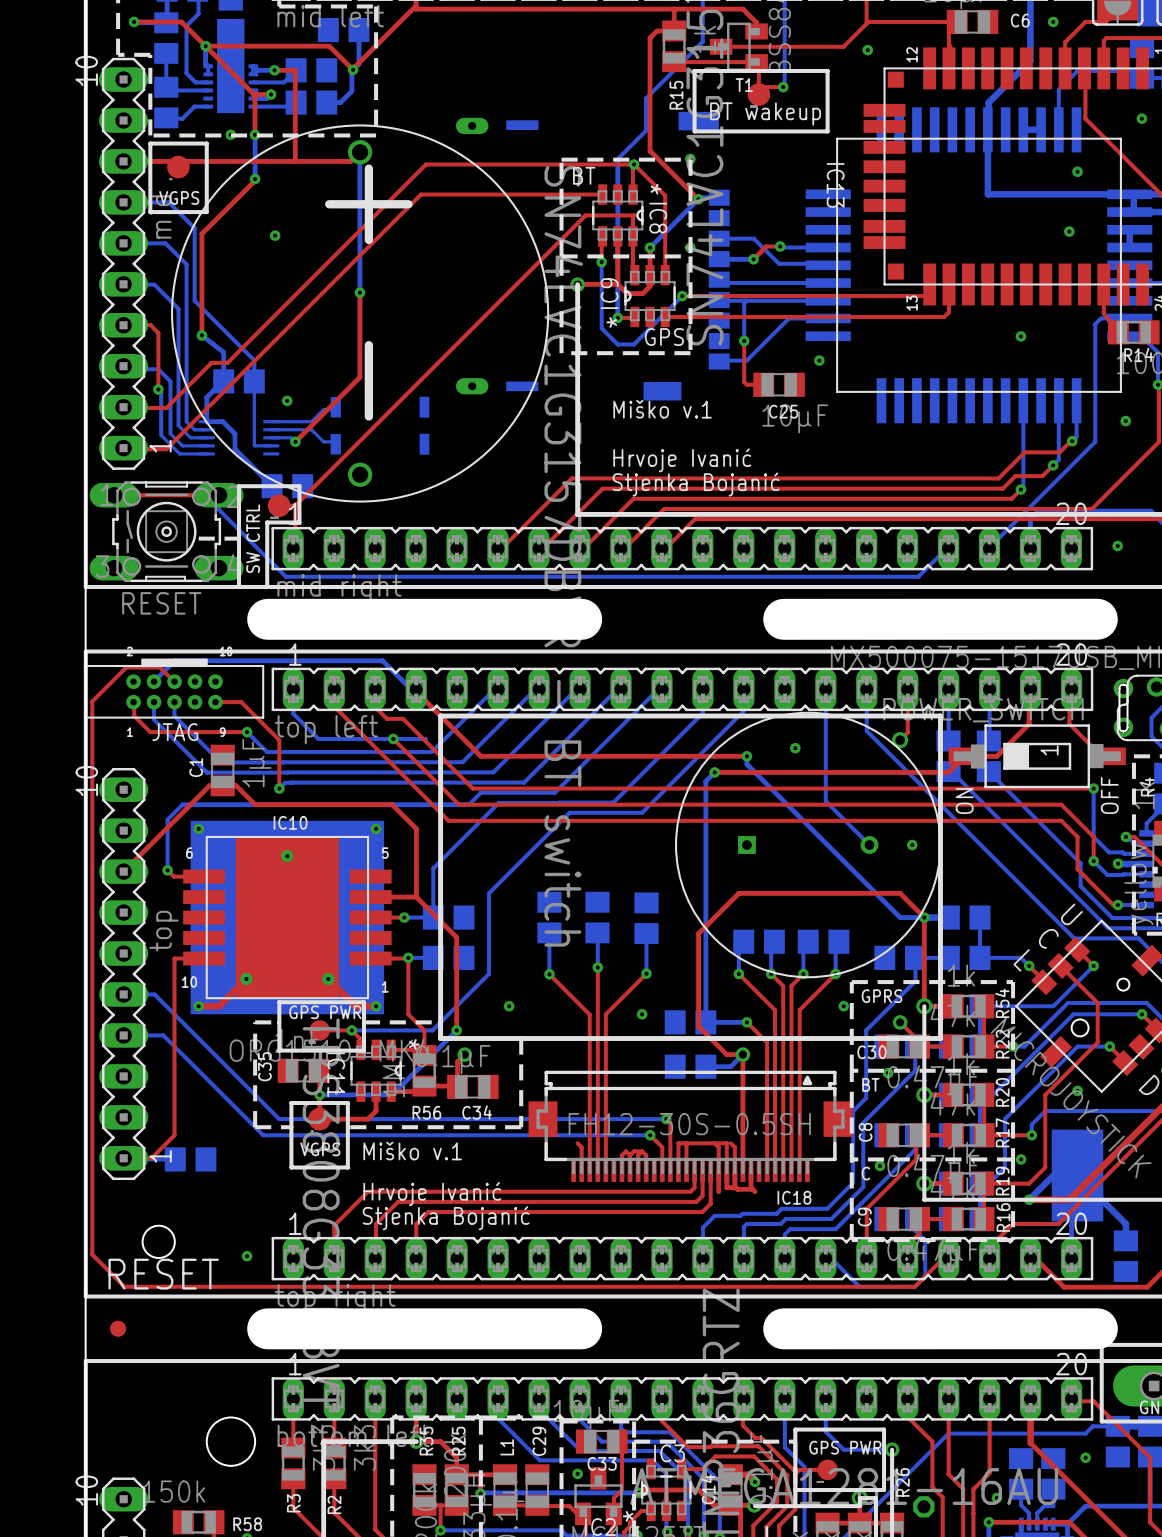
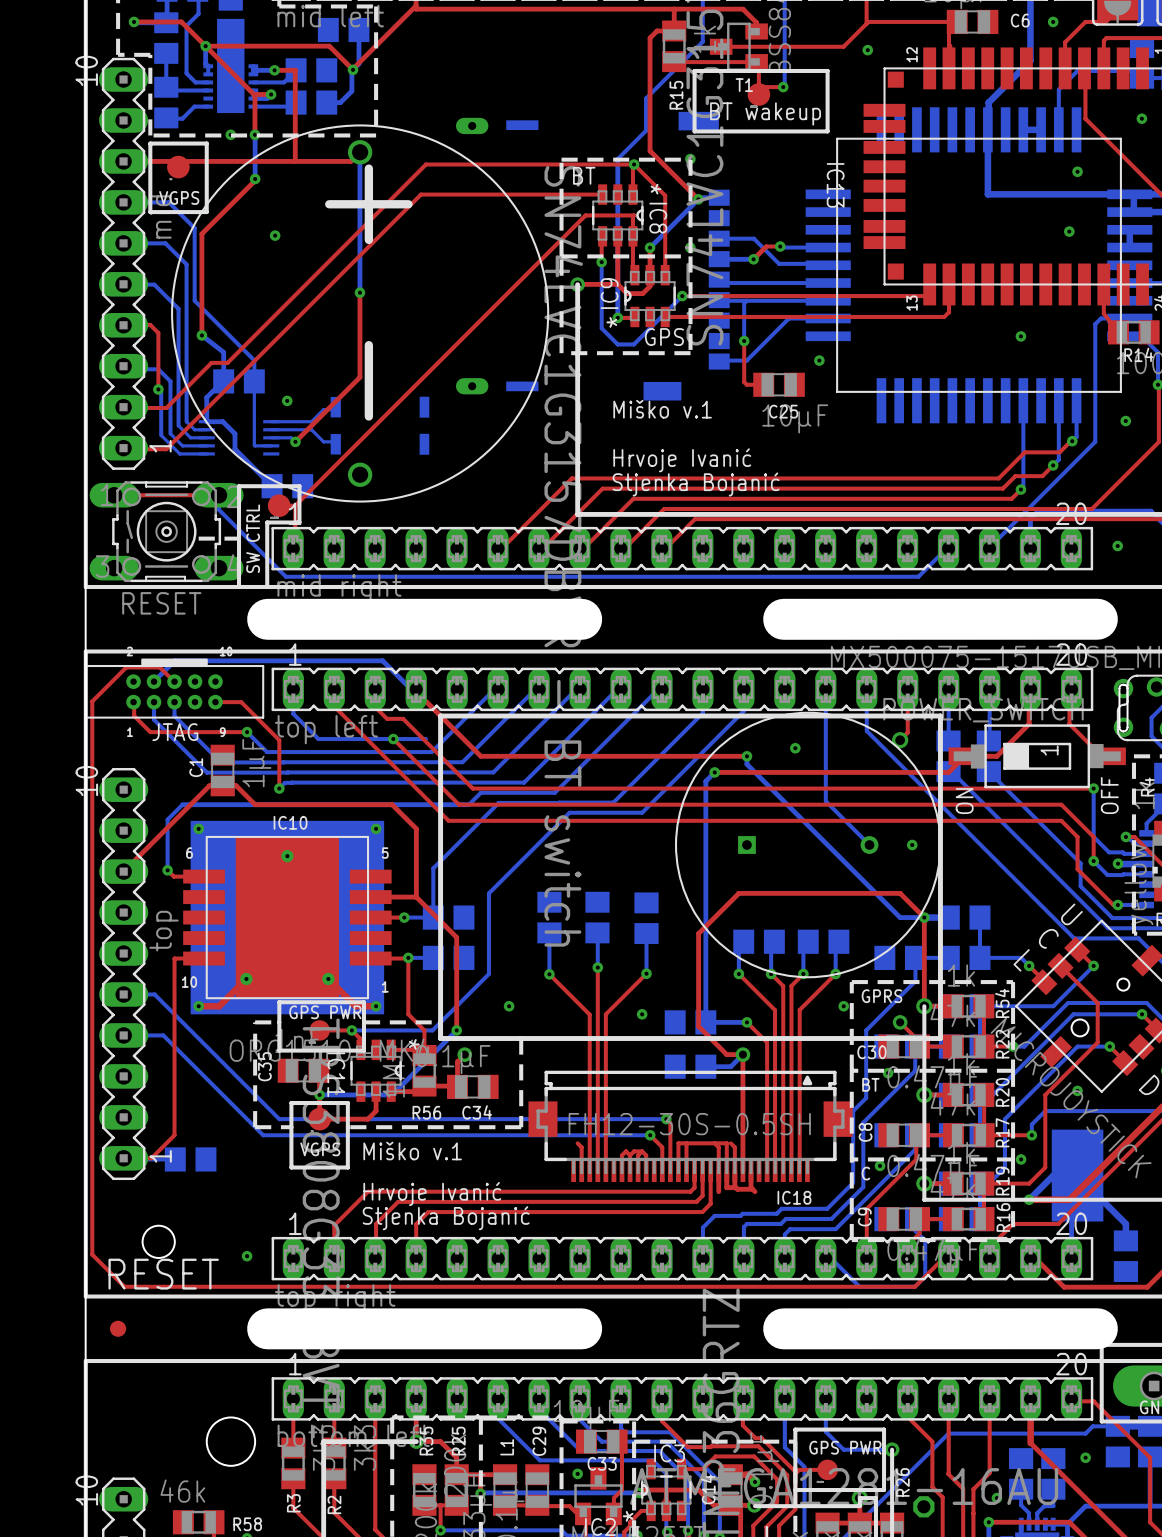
R58 value: 150k (174, 1491) -> 46k (182, 1491)

